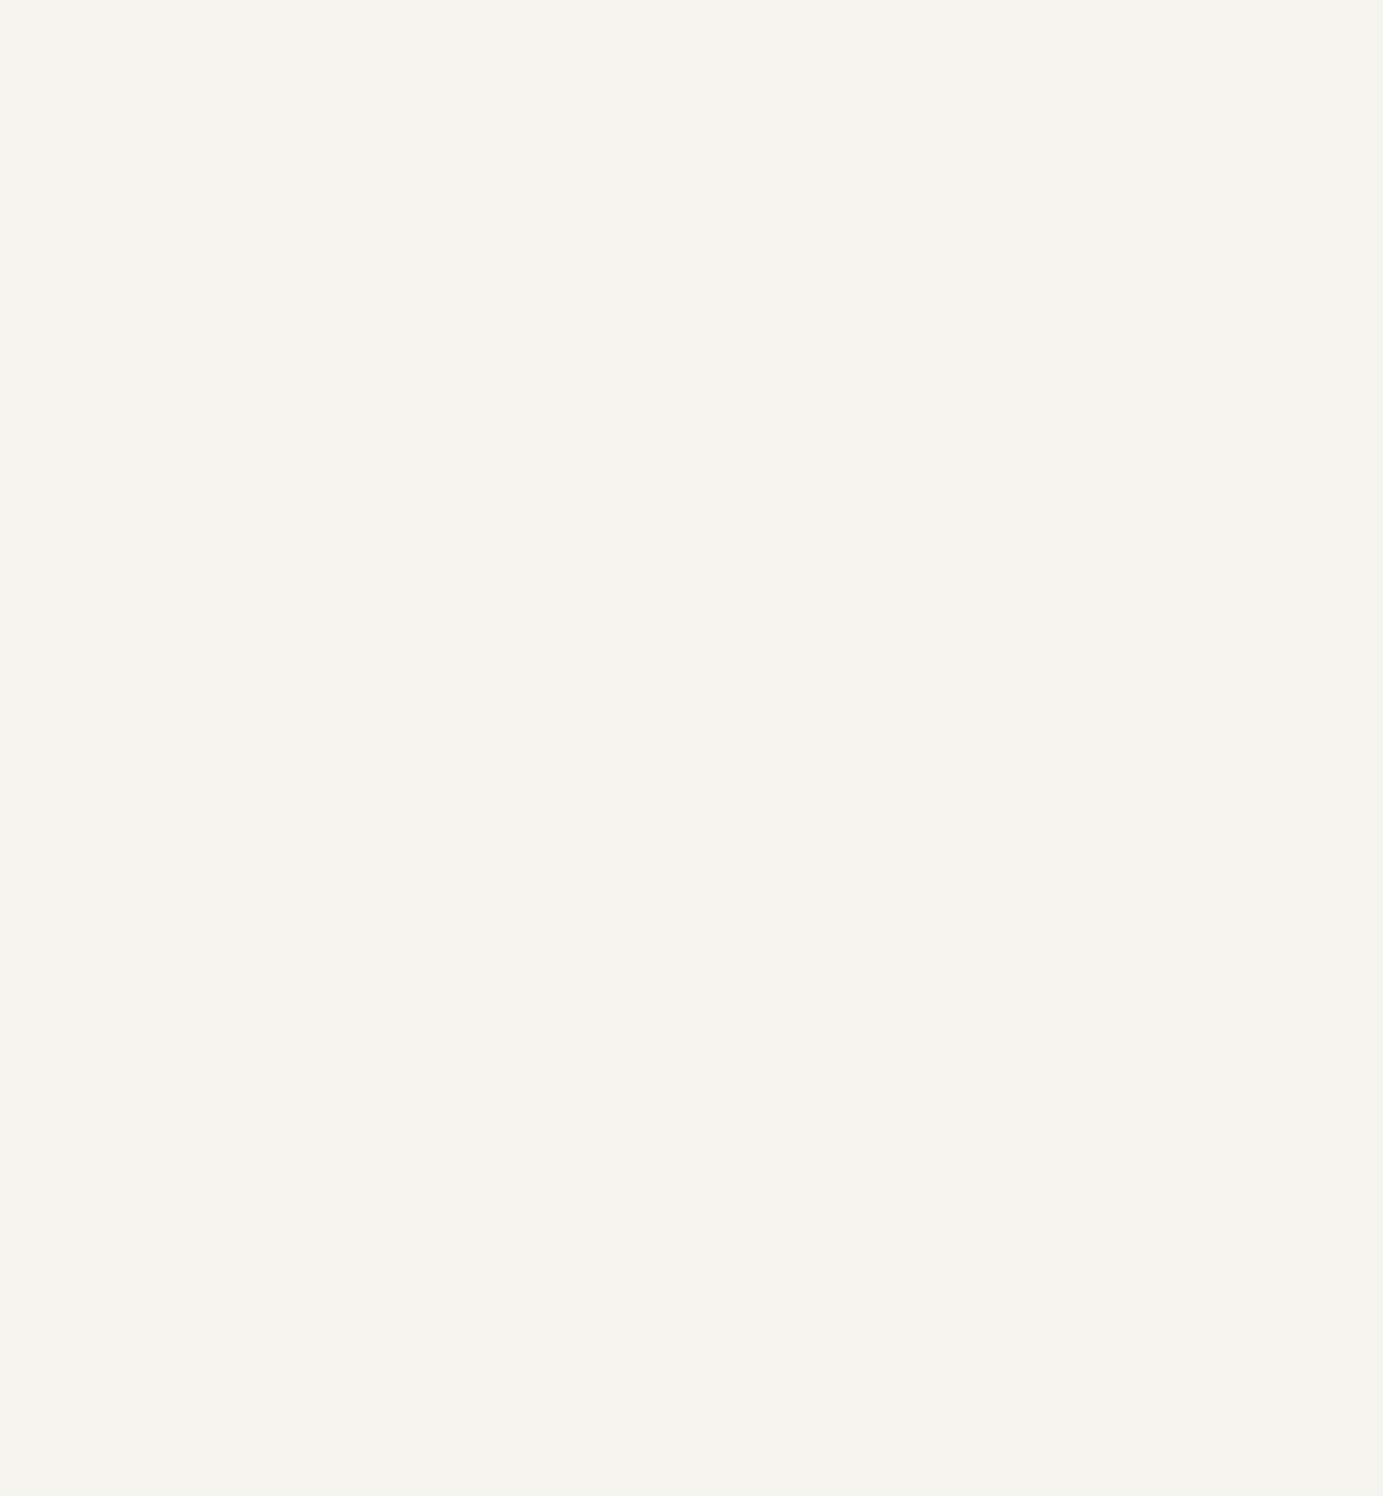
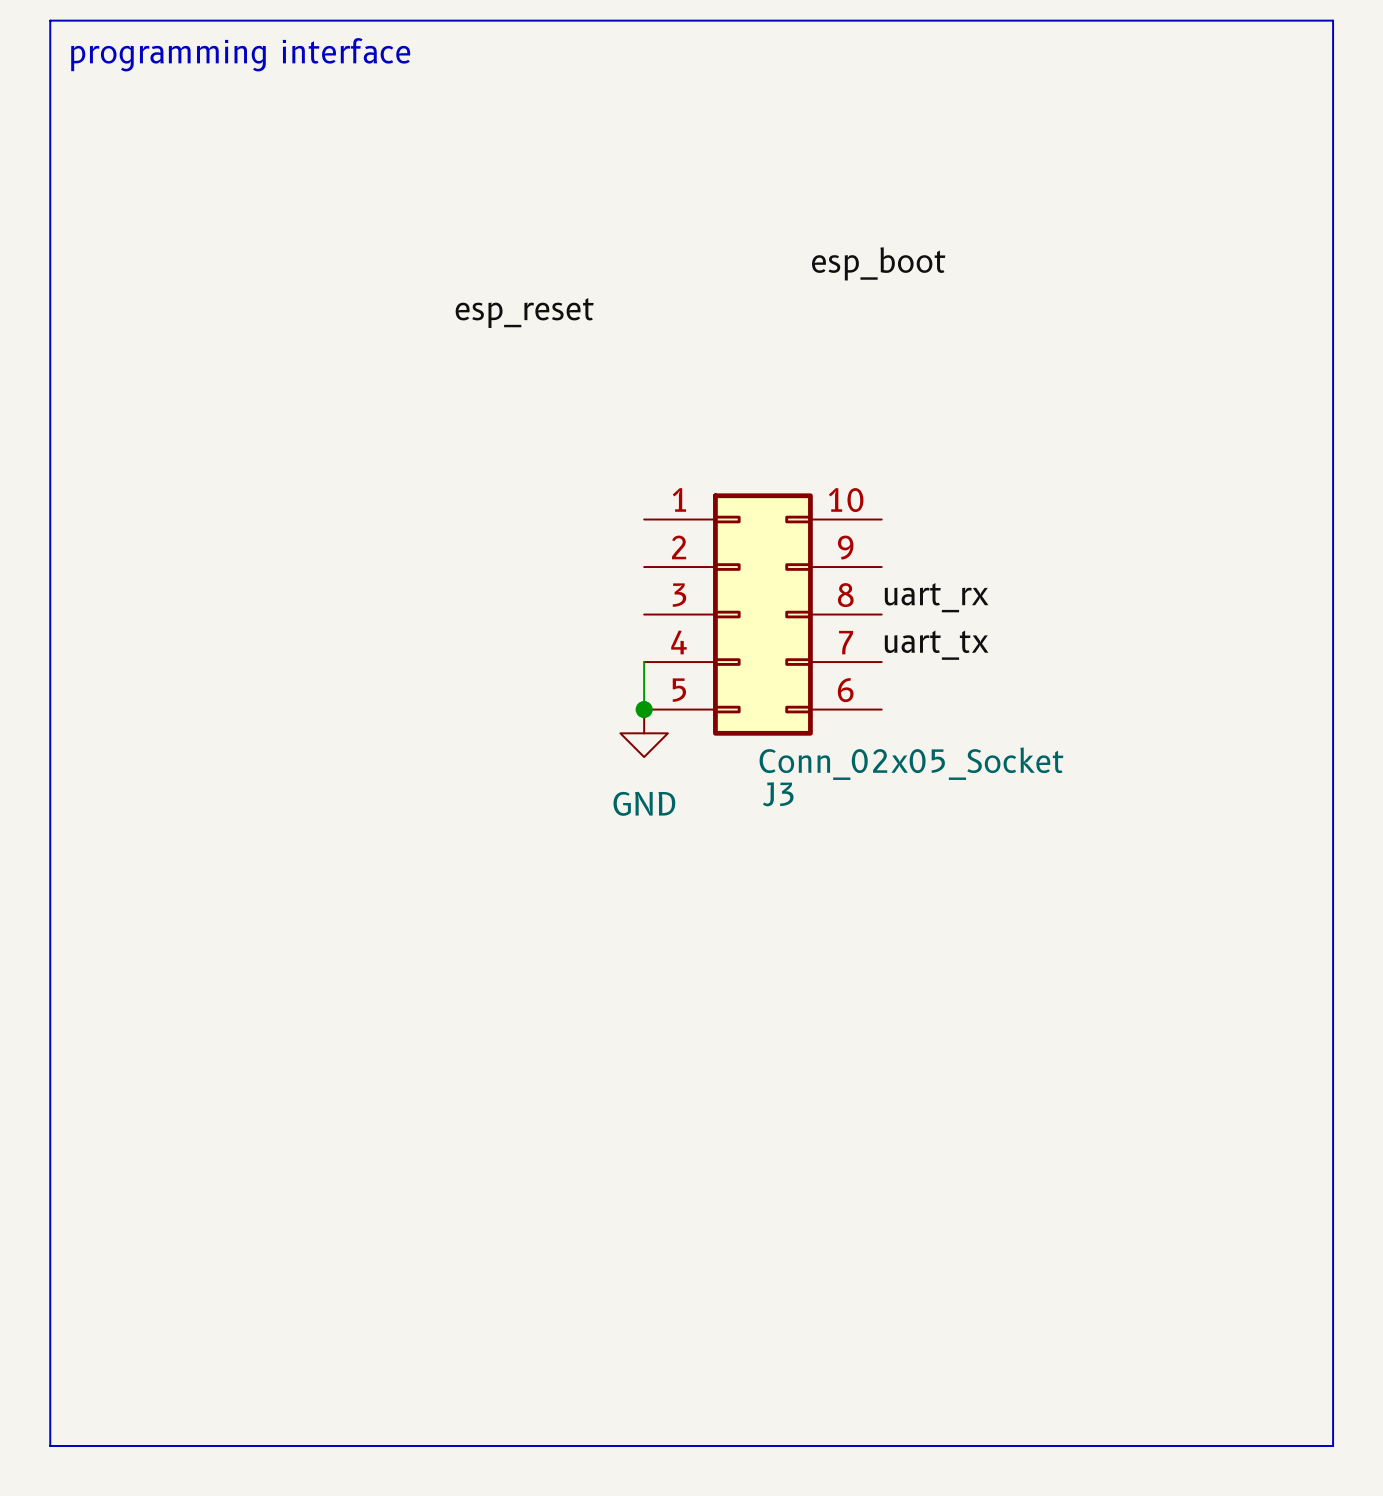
line: none -> (50, 20) (1333, 20) (1333, 1445) (50, 1445) (50, 20)
text: none -> programming interface (240, 54)
label: none -> esp_boot (878, 263)
label: none -> esp_reset (524, 312)
label: none -> uart_rx (936, 597)
J3: none -> Conn_02x05_Socket (762, 614)
label: none -> uart_tx (936, 645)
wire: none -> (644, 662) (644, 709)
junction: none -> (644, 709)
power symbol: none -> GND (644, 733)

